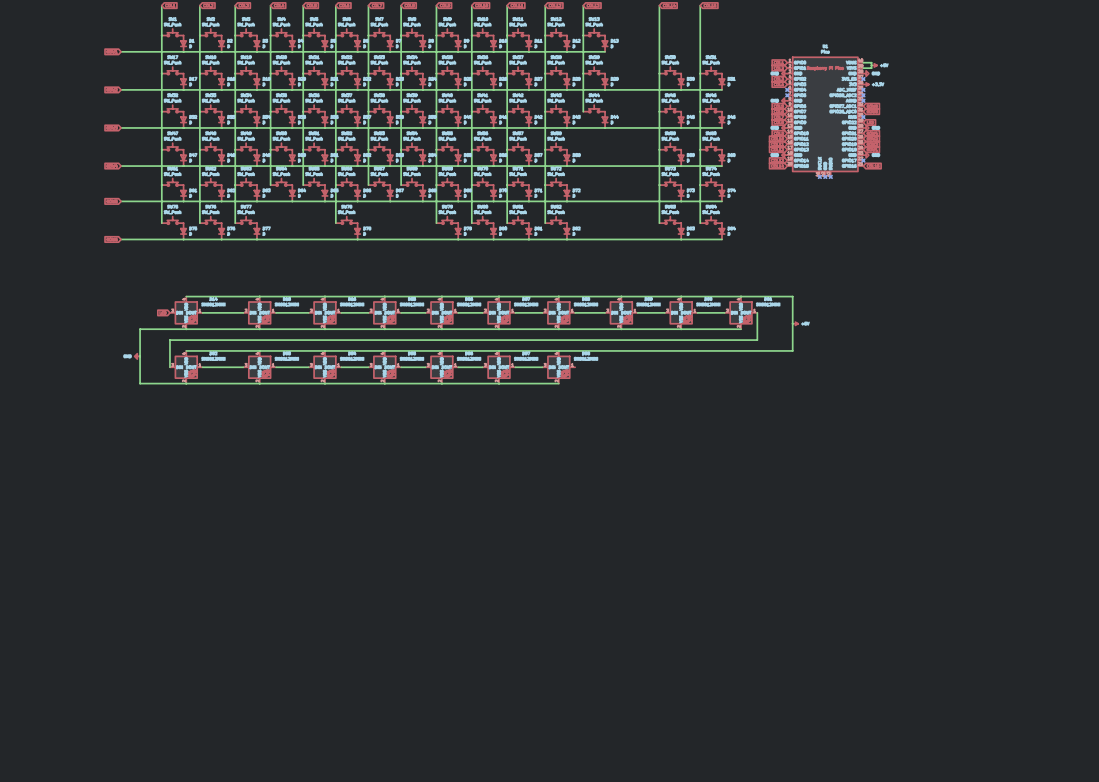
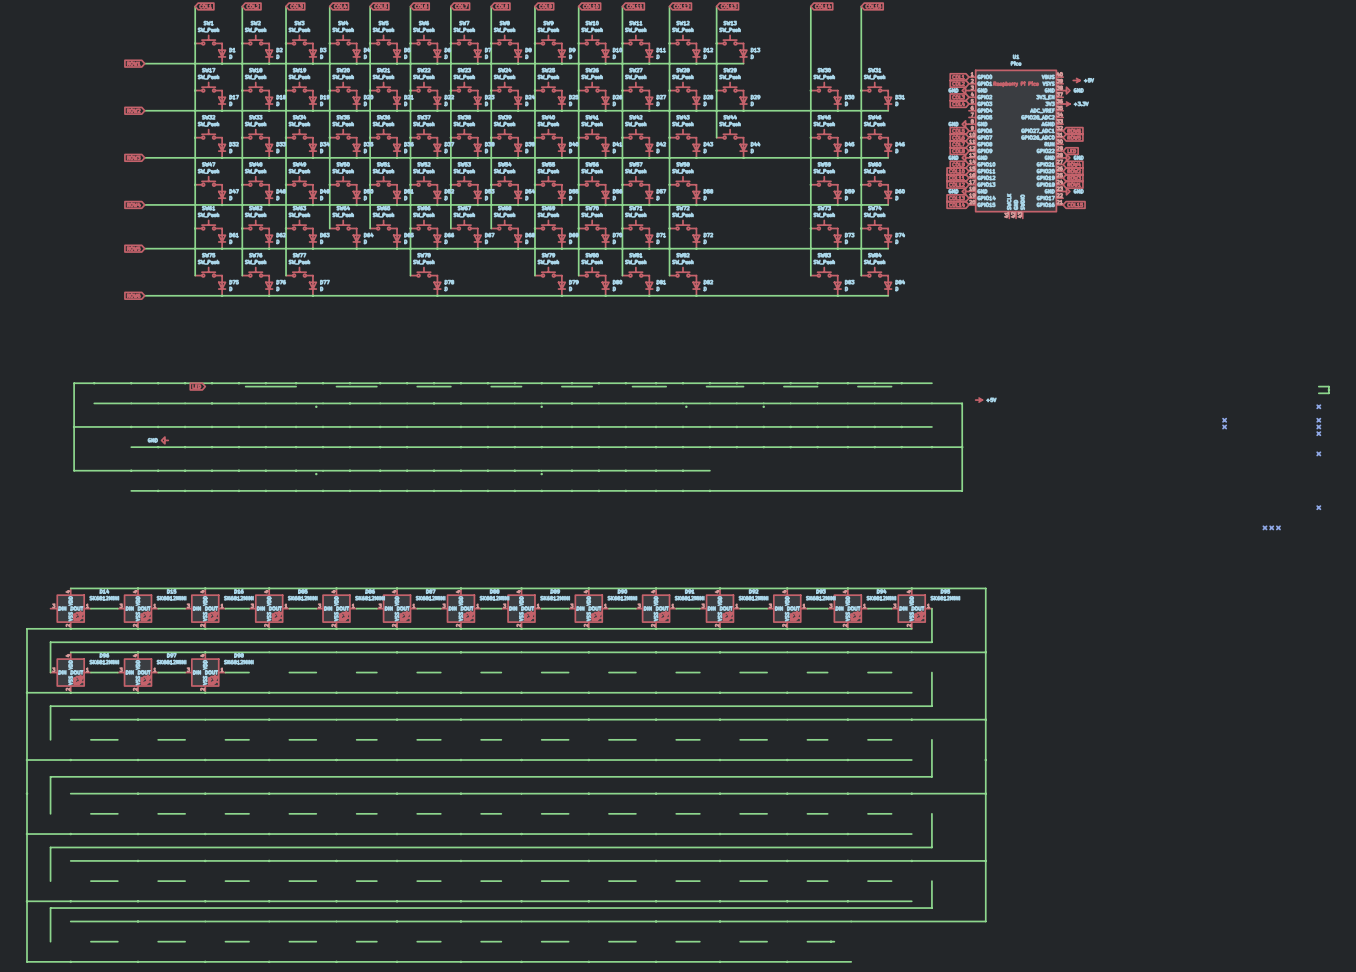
wire: (863, 62) (871, 62) (871, 68) (863, 68) -> none
no-connect mark: (863, 79) -> none
no-connect mark: (787, 89) -> none
no-connect mark: (863, 89) -> none
no-connect mark: (787, 95) -> none
no-connect mark: (863, 95) -> none
no-connect mark: (863, 100) -> none
no-connect mark: (863, 117) -> none
no-connect mark: (863, 160) -> none
no-connect mark: (819, 176) -> none
no-connect mark: (825, 176) -> none
no-connect mark: (830, 176) -> none
wire: (186, 296) (792, 296) (792, 350) (186, 350) -> none
wire: none -> (931, 383) (74, 383) (74, 470) (709, 470)
part position: (186, 312) -> (70, 608)
part position: (259, 312) -> (138, 608)
part position: (324, 312) -> (205, 608)
part position: (384, 312) -> (269, 608)
part position: (441, 312) -> (336, 608)
part position: (499, 312) -> (397, 608)
part position: (558, 312) -> (460, 608)
part position: (621, 312) -> (521, 608)
part position: (681, 312) -> (588, 608)
part position: (741, 312) -> (656, 608)
wire: (757, 312) (757, 340) (169, 340) (169, 367) -> none
wire: none -> (1318, 386) (1328, 386) (1328, 393) (1318, 393)
wire: none -> (94, 403) (962, 403) (962, 490) (131, 490)
wire: (741, 329) (140, 329) (140, 383) (558, 383) -> none
no-connect mark: none -> (1318, 406)
no-connect mark: none -> (1224, 420)
no-connect mark: none -> (1318, 420)
wire: none -> (74, 426) (931, 426)
no-connect mark: none -> (1224, 426)
no-connect mark: none -> (1318, 426)
no-connect mark: none -> (1318, 433)
wire: none -> (131, 447) (962, 447)
part position: (186, 367) -> (719, 608)
wire: (202, 367) (243, 367) -> none
part position: (259, 367) -> (787, 608)
wire: (276, 367) (308, 367) -> none
part position: (324, 367) -> (847, 608)
wire: (341, 367) (368, 367) -> none
part position: (384, 367) -> (911, 608)
wire: (401, 367) (425, 367) -> none
part position: (441, 367) -> (70, 672)
wire: (458, 367) (482, 367) -> none
part position: (499, 367) -> (138, 672)
wire: (515, 367) (542, 367) -> none
part position: (558, 367) -> (205, 672)
no-connect mark: none -> (1318, 453)
no-connect mark: none -> (1318, 507)
no-connect mark: none -> (1264, 527)
no-connect mark: none -> (1271, 527)
no-connect mark: none -> (1278, 527)
wire: none -> (70, 588) (985, 588) (985, 921) (70, 921)
wire: none -> (90, 608) (117, 608)
wire: none -> (158, 608) (185, 608)
wire: none -> (225, 608) (249, 608)
wire: none -> (289, 608) (316, 608)
wire: none -> (356, 608) (376, 608)
wire: none -> (417, 608) (440, 608)
wire: none -> (481, 608) (501, 608)
wire: none -> (541, 608) (568, 608)
wire: none -> (608, 608) (635, 608)
wire: none -> (676, 608) (699, 608)
wire: none -> (740, 608) (767, 608)
wire: none -> (807, 608) (827, 608)
wire: none -> (868, 608) (891, 608)
wire: none -> (931, 608) (931, 642) (50, 642) (50, 672)
wire: none -> (911, 628) (26, 628) (26, 961) (851, 961)
wire: none -> (70, 652) (985, 652)
wire: none -> (90, 672) (117, 672)
wire: none -> (158, 672) (185, 672)
wire: none -> (225, 672) (249, 672)
wire: none -> (289, 672) (316, 672)
wire: none -> (356, 672) (376, 672)
wire: none -> (417, 672) (440, 672)
wire: none -> (481, 672) (501, 672)
wire: none -> (541, 672) (568, 672)
wire: none -> (608, 672) (635, 672)
wire: none -> (676, 672) (699, 672)
wire: none -> (740, 672) (767, 672)
wire: none -> (807, 672) (827, 672)
wire: none -> (868, 672) (891, 672)
wire: none -> (931, 672) (931, 706) (50, 706) (50, 739)
wire: none -> (26, 692) (911, 692)
wire: none -> (70, 719) (985, 719)
wire: none -> (90, 739) (117, 739)
wire: none -> (158, 739) (185, 739)
wire: none -> (225, 739) (249, 739)
wire: none -> (289, 739) (316, 739)
wire: none -> (356, 739) (376, 739)
wire: none -> (417, 739) (440, 739)
wire: none -> (481, 739) (501, 739)
wire: none -> (541, 739) (568, 739)
wire: none -> (608, 739) (635, 739)
wire: none -> (676, 739) (699, 739)
wire: none -> (740, 739) (767, 739)
wire: none -> (807, 739) (827, 739)
wire: none -> (868, 739) (891, 739)
wire: none -> (931, 739) (931, 776) (50, 776) (50, 813)
wire: none -> (26, 760) (911, 760)
wire: none -> (70, 793) (985, 793)
wire: none -> (90, 813) (117, 813)
wire: none -> (158, 813) (185, 813)
wire: none -> (225, 813) (249, 813)
wire: none -> (289, 813) (316, 813)
wire: none -> (356, 813) (376, 813)
wire: none -> (417, 813) (440, 813)
wire: none -> (481, 813) (501, 813)
wire: none -> (541, 813) (568, 813)
wire: none -> (608, 813) (635, 813)
wire: none -> (676, 813) (699, 813)
wire: none -> (740, 813) (767, 813)
wire: none -> (807, 813) (827, 813)
wire: none -> (868, 813) (891, 813)
wire: none -> (931, 813) (931, 847) (50, 847) (50, 881)
wire: none -> (26, 834) (911, 834)
wire: none -> (70, 860) (985, 860)
wire: none -> (90, 881) (117, 881)
wire: none -> (158, 881) (185, 881)
wire: none -> (225, 881) (249, 881)
wire: none -> (289, 881) (316, 881)
wire: none -> (356, 881) (376, 881)
wire: none -> (417, 881) (440, 881)
wire: none -> (481, 881) (501, 881)
wire: none -> (541, 881) (568, 881)
wire: none -> (608, 881) (635, 881)
wire: none -> (676, 881) (699, 881)
wire: none -> (740, 881) (767, 881)
wire: none -> (807, 881) (827, 881)
wire: none -> (868, 881) (891, 881)
wire: none -> (931, 881) (931, 908) (50, 908) (50, 941)
wire: none -> (26, 901) (911, 901)
junction: none -> (138, 921)
junction: none -> (397, 921)
junction: none -> (460, 921)
junction: none -> (656, 921)
junction: none -> (719, 921)
wire: none -> (90, 941) (117, 941)
wire: none -> (158, 941) (185, 941)
wire: none -> (225, 941) (249, 941)
wire: none -> (289, 941) (316, 941)
wire: none -> (356, 941) (376, 941)
wire: none -> (417, 941) (440, 941)
wire: none -> (481, 941) (501, 941)
wire: none -> (541, 941) (568, 941)
wire: none -> (608, 941) (635, 941)
wire: none -> (676, 941) (699, 941)
wire: none -> (740, 941) (767, 941)
wire: none -> (807, 941) (834, 941)

